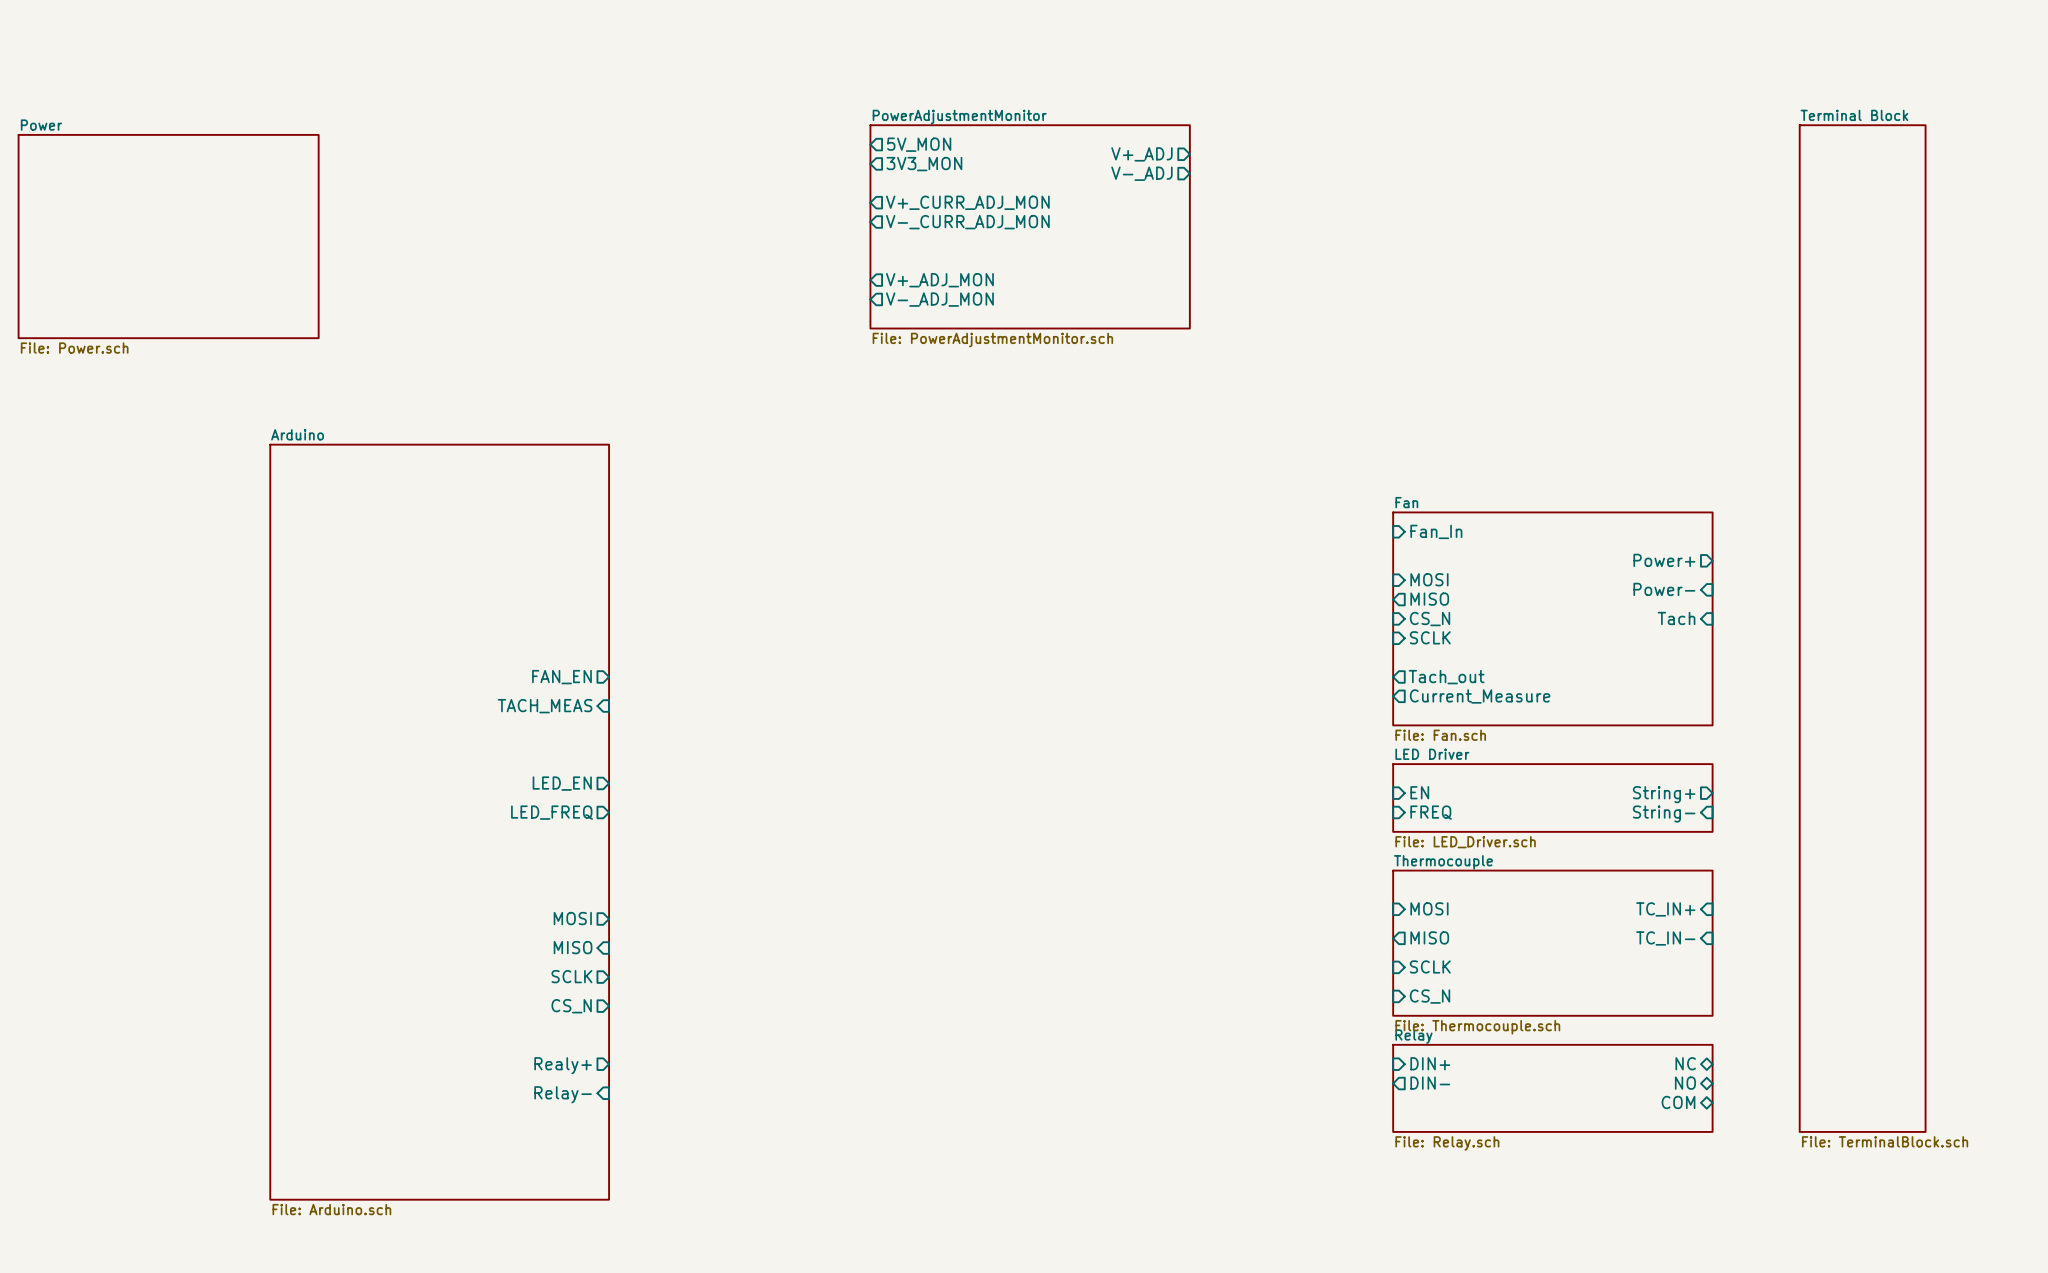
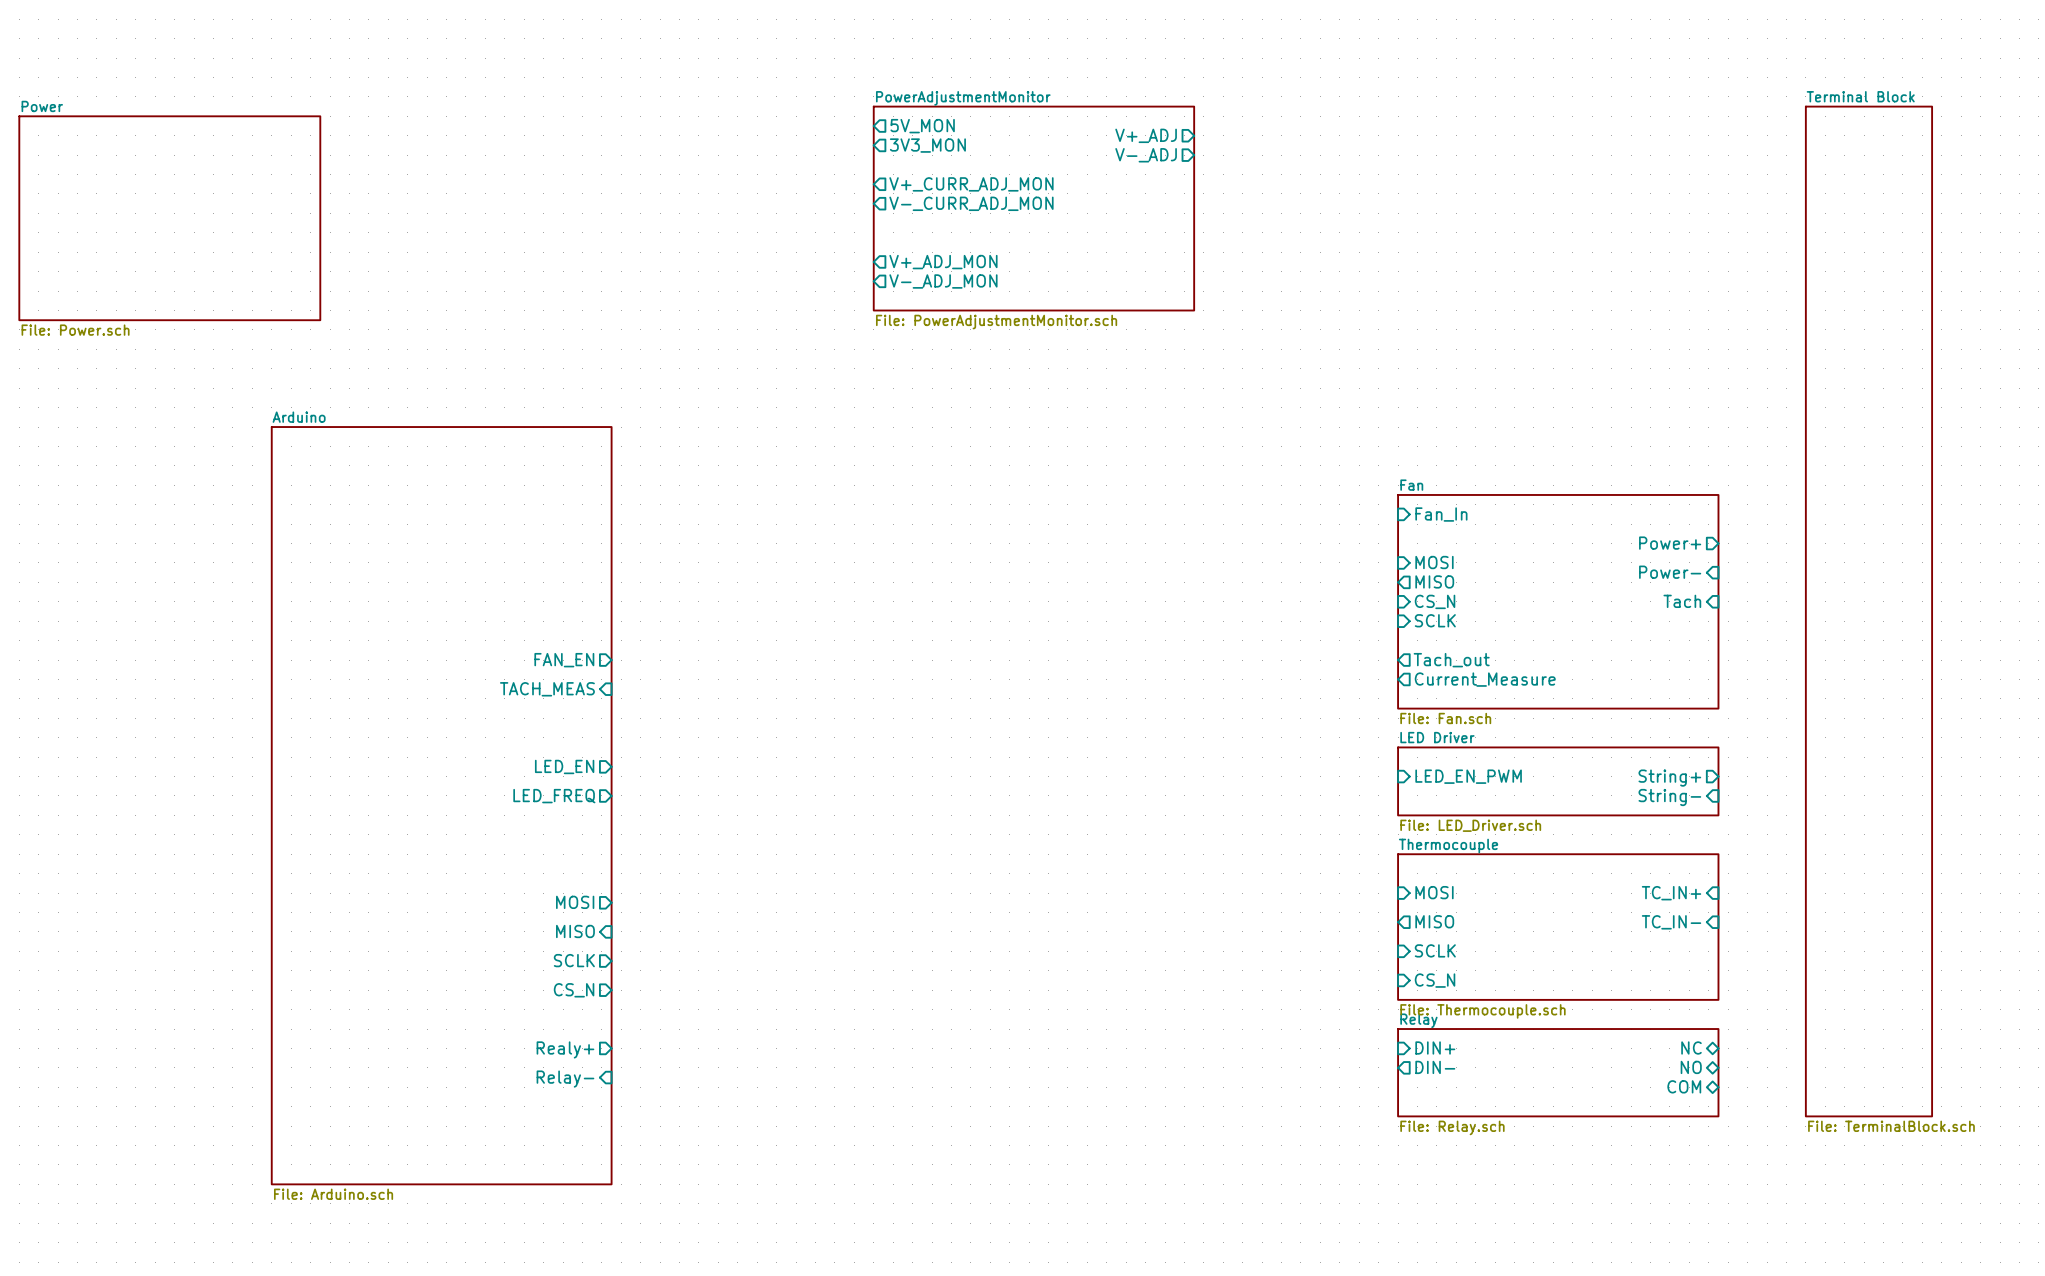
sheet pin: EN (1419, 792) -> LED_EN_PWM (1468, 776)
sheet pin: FREQ (1431, 812) -> none

